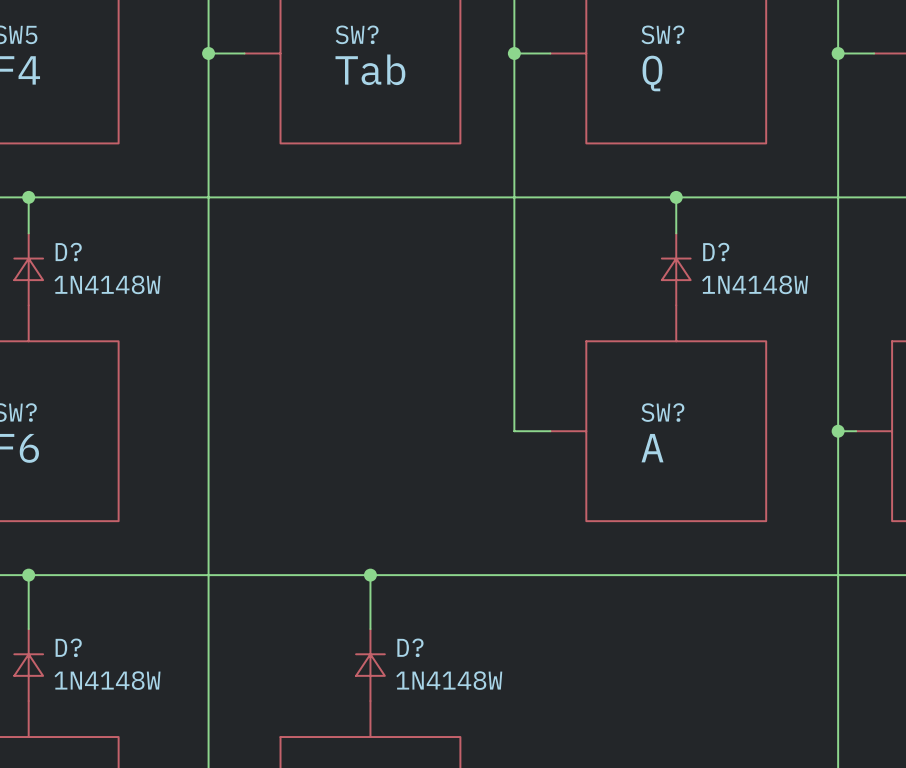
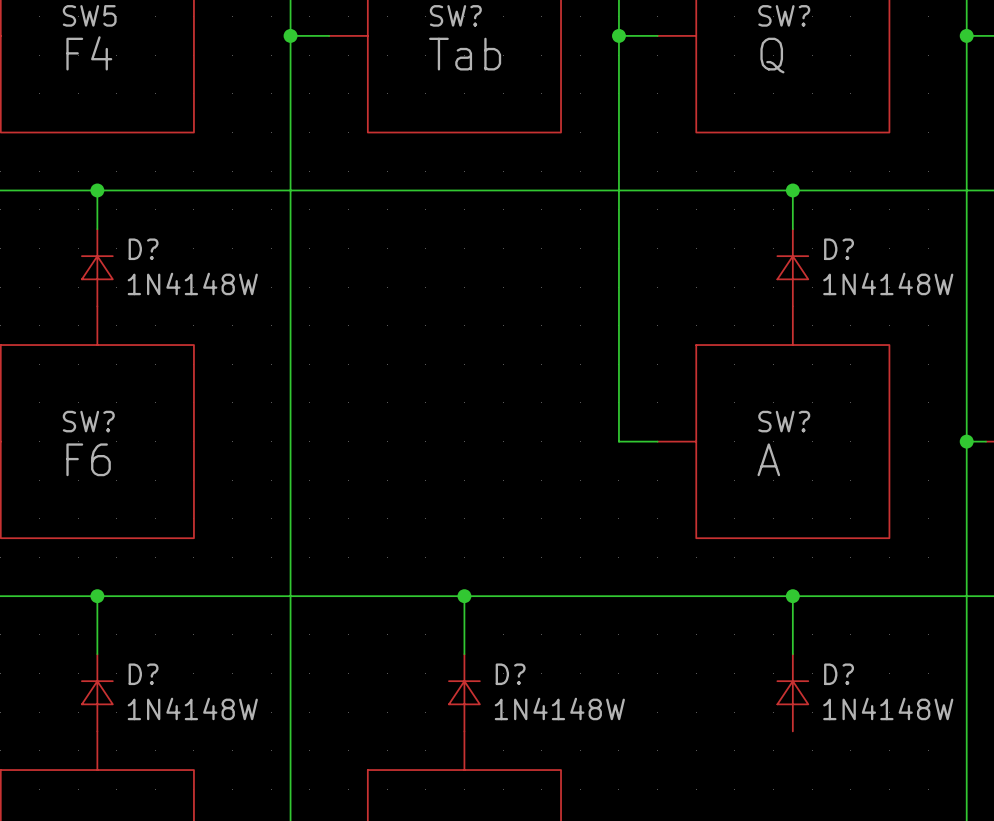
wire: none -> (792, 596) (792, 654)
junction: none -> (792, 596)
D?: none -> 1N4148W (792, 692)

